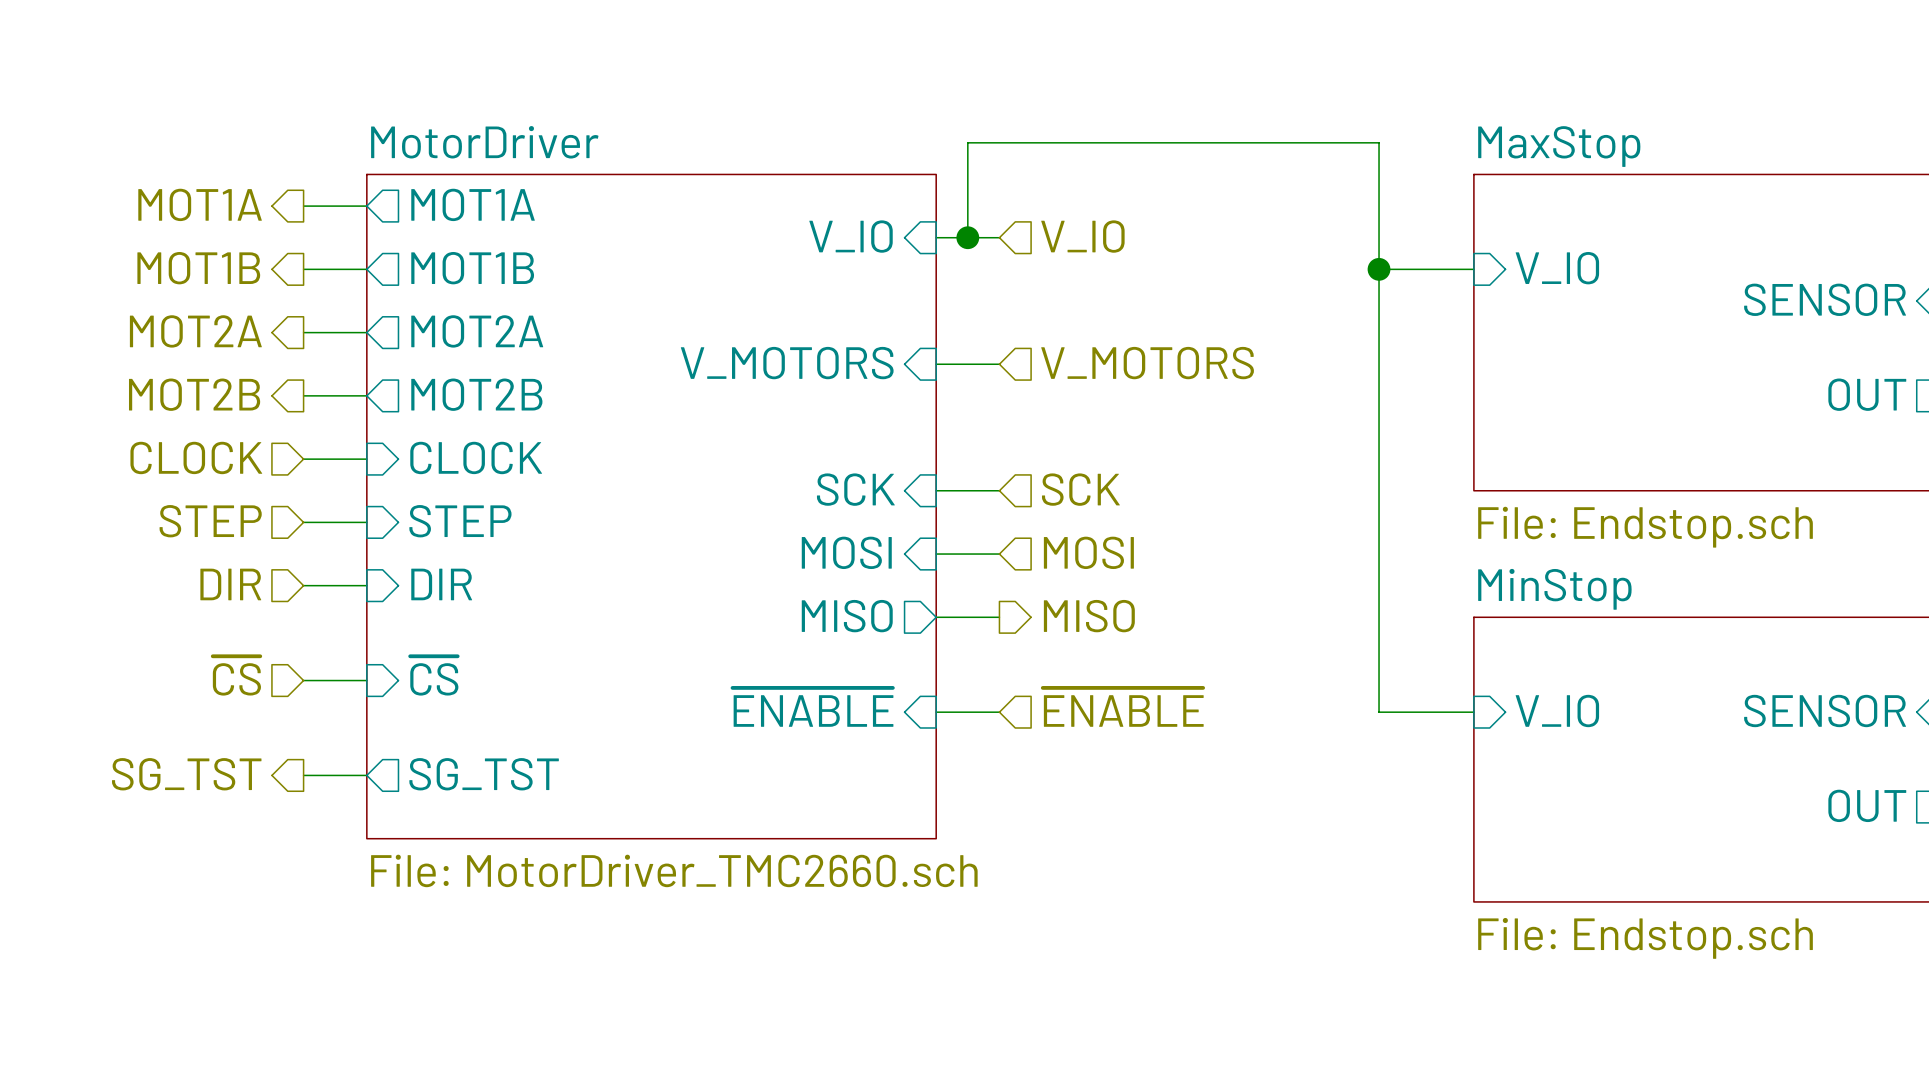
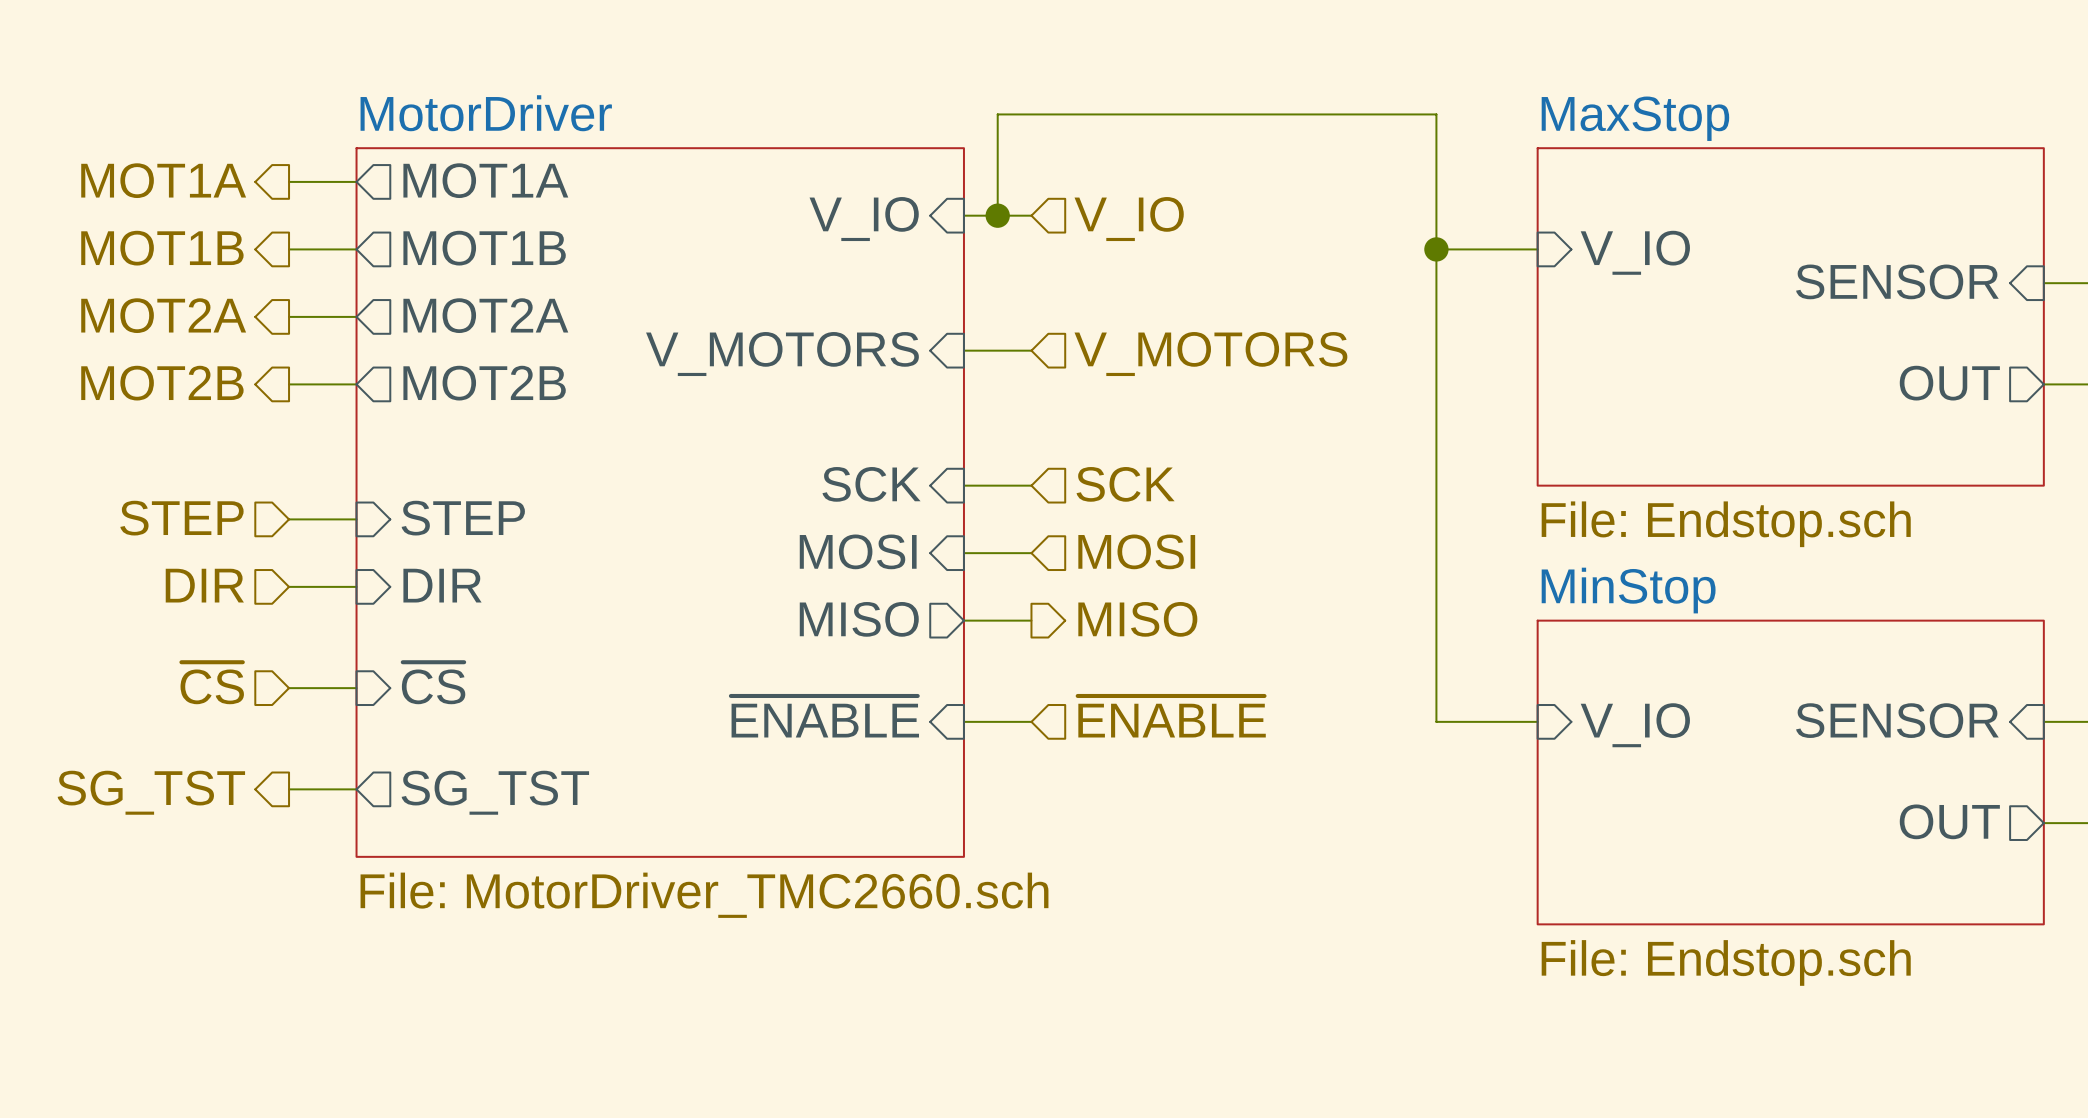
hierarchical label: CLOCK (196, 457) -> none
sheet pin: CLOCK (476, 457) -> none
wire: (303, 459) (366, 459) -> none

